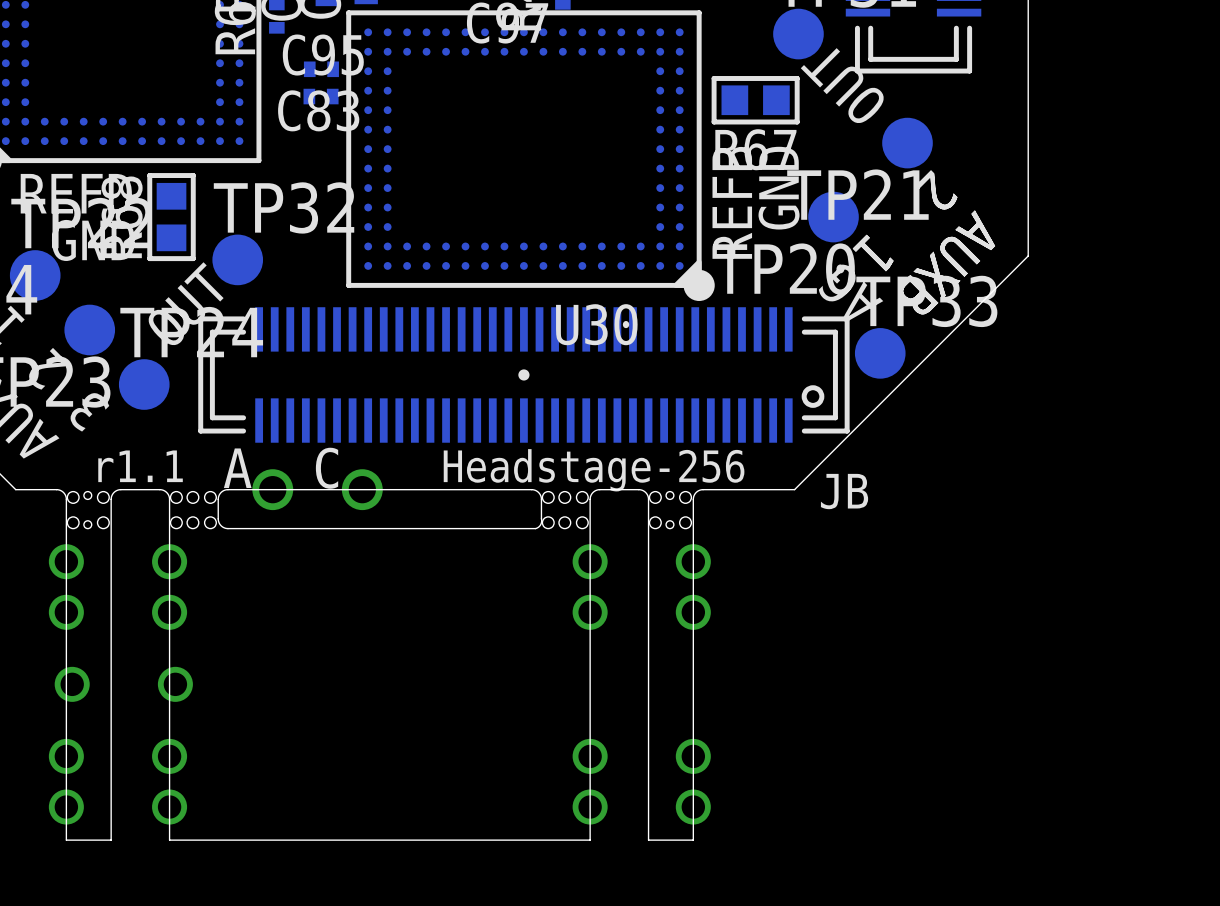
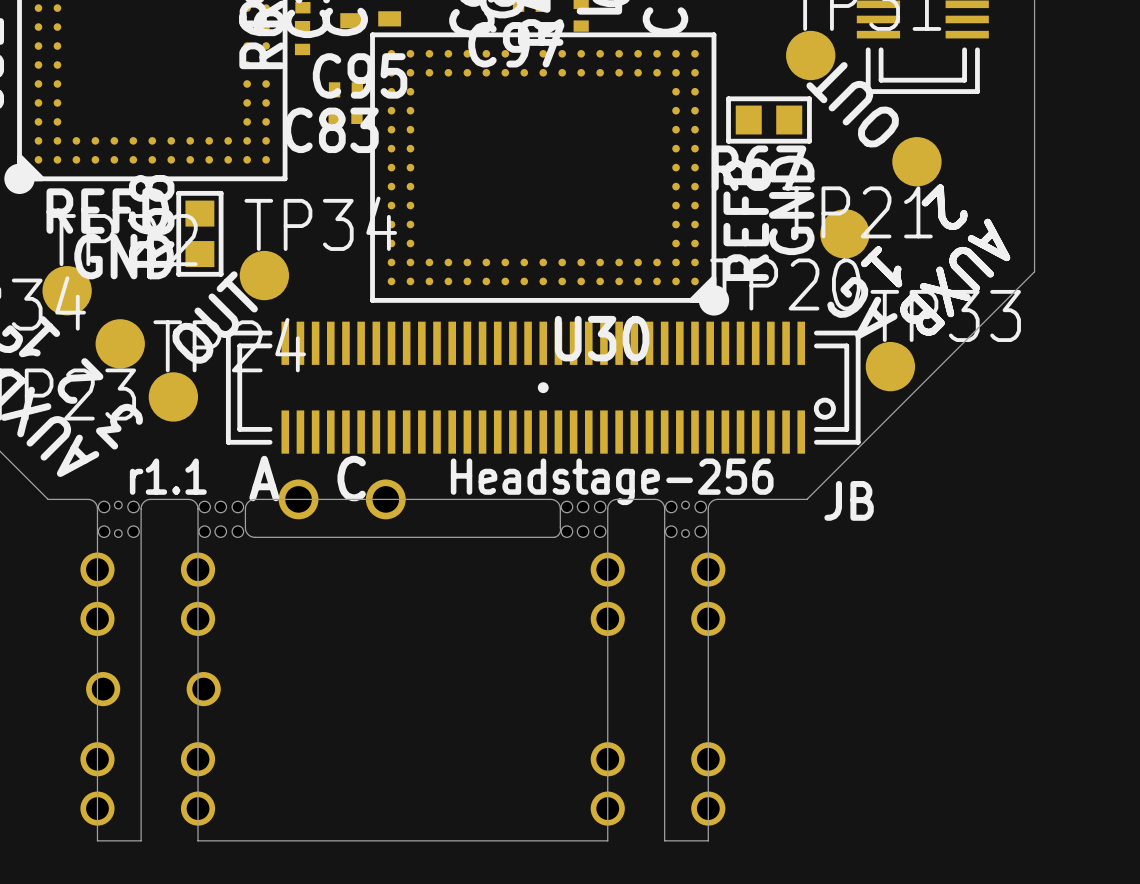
TP32 name: TP32 (284, 207) -> TP34 (320, 223)

